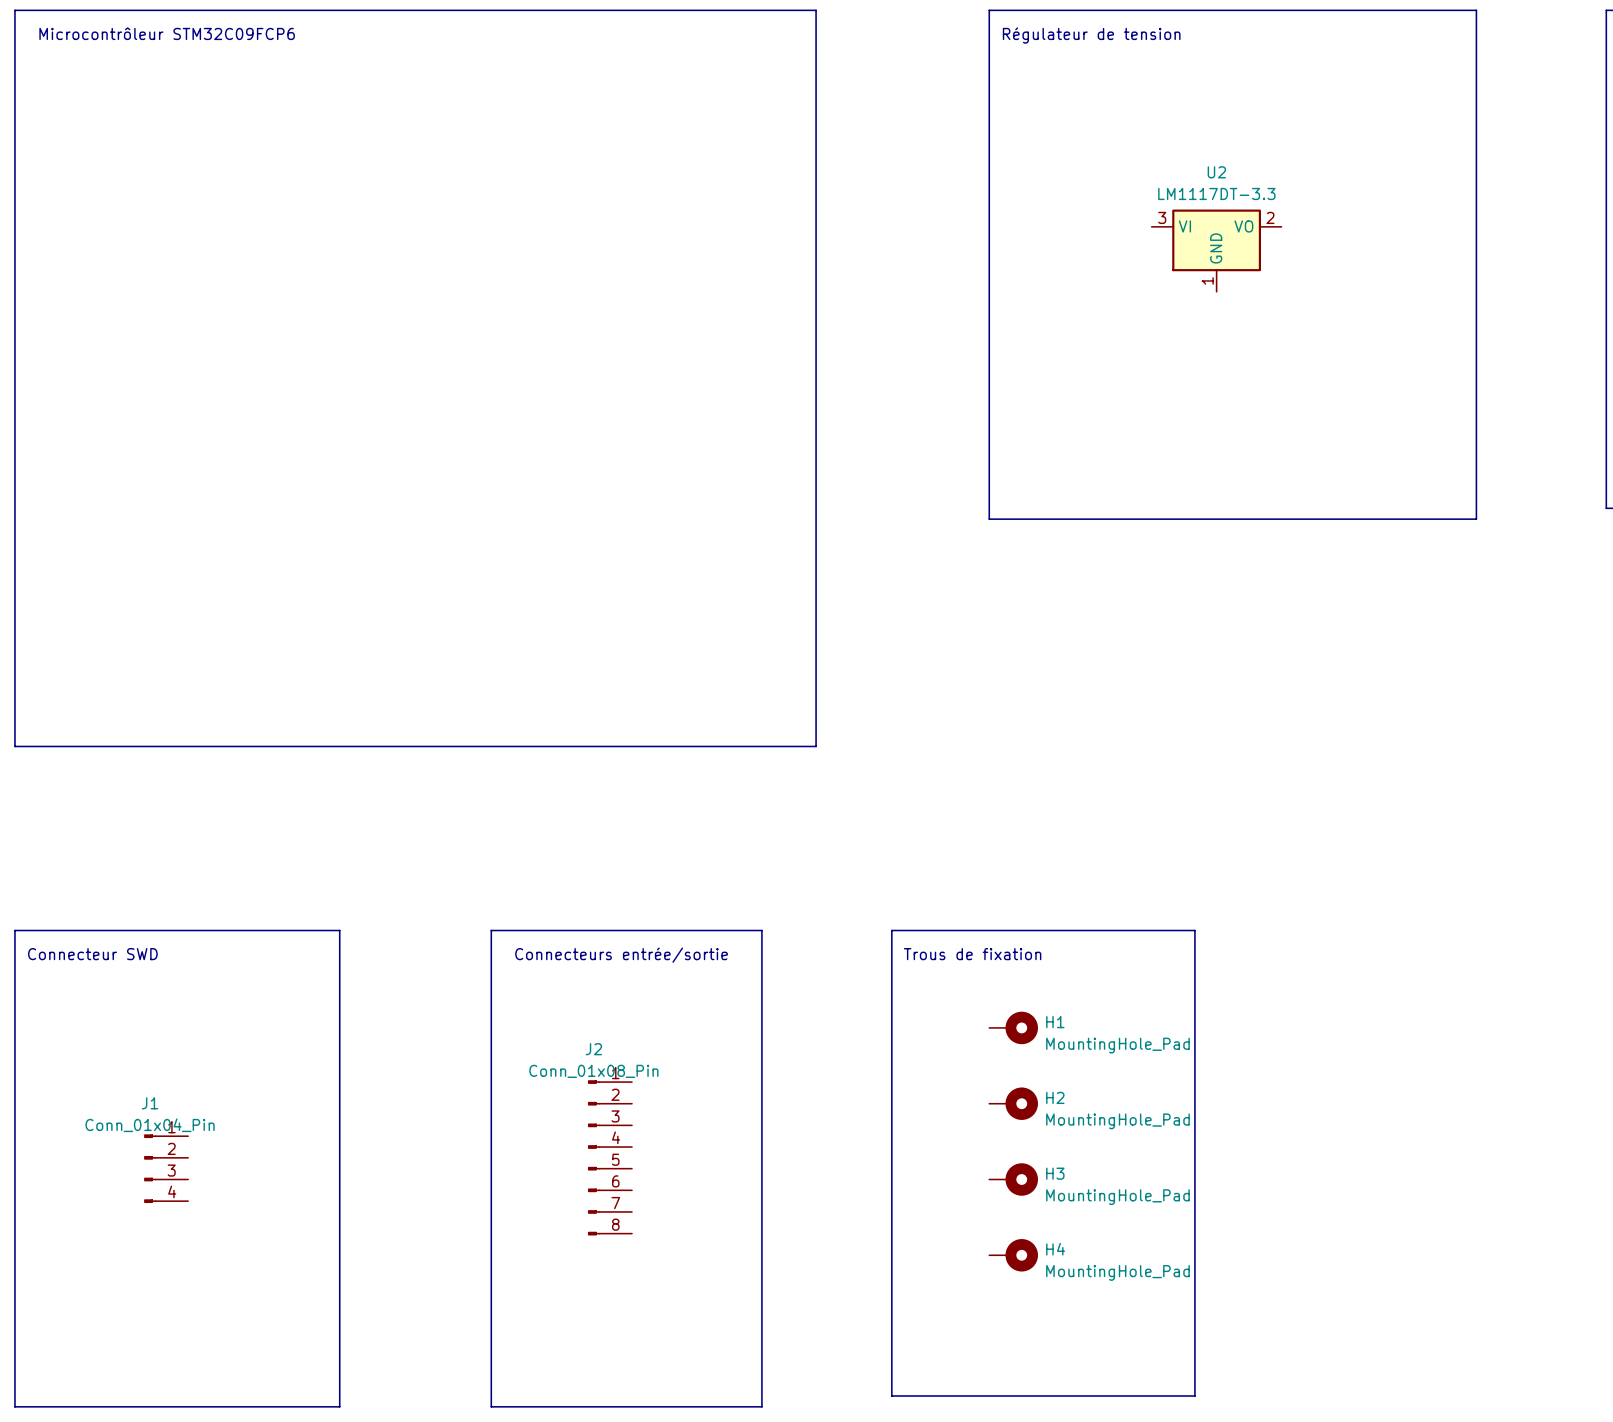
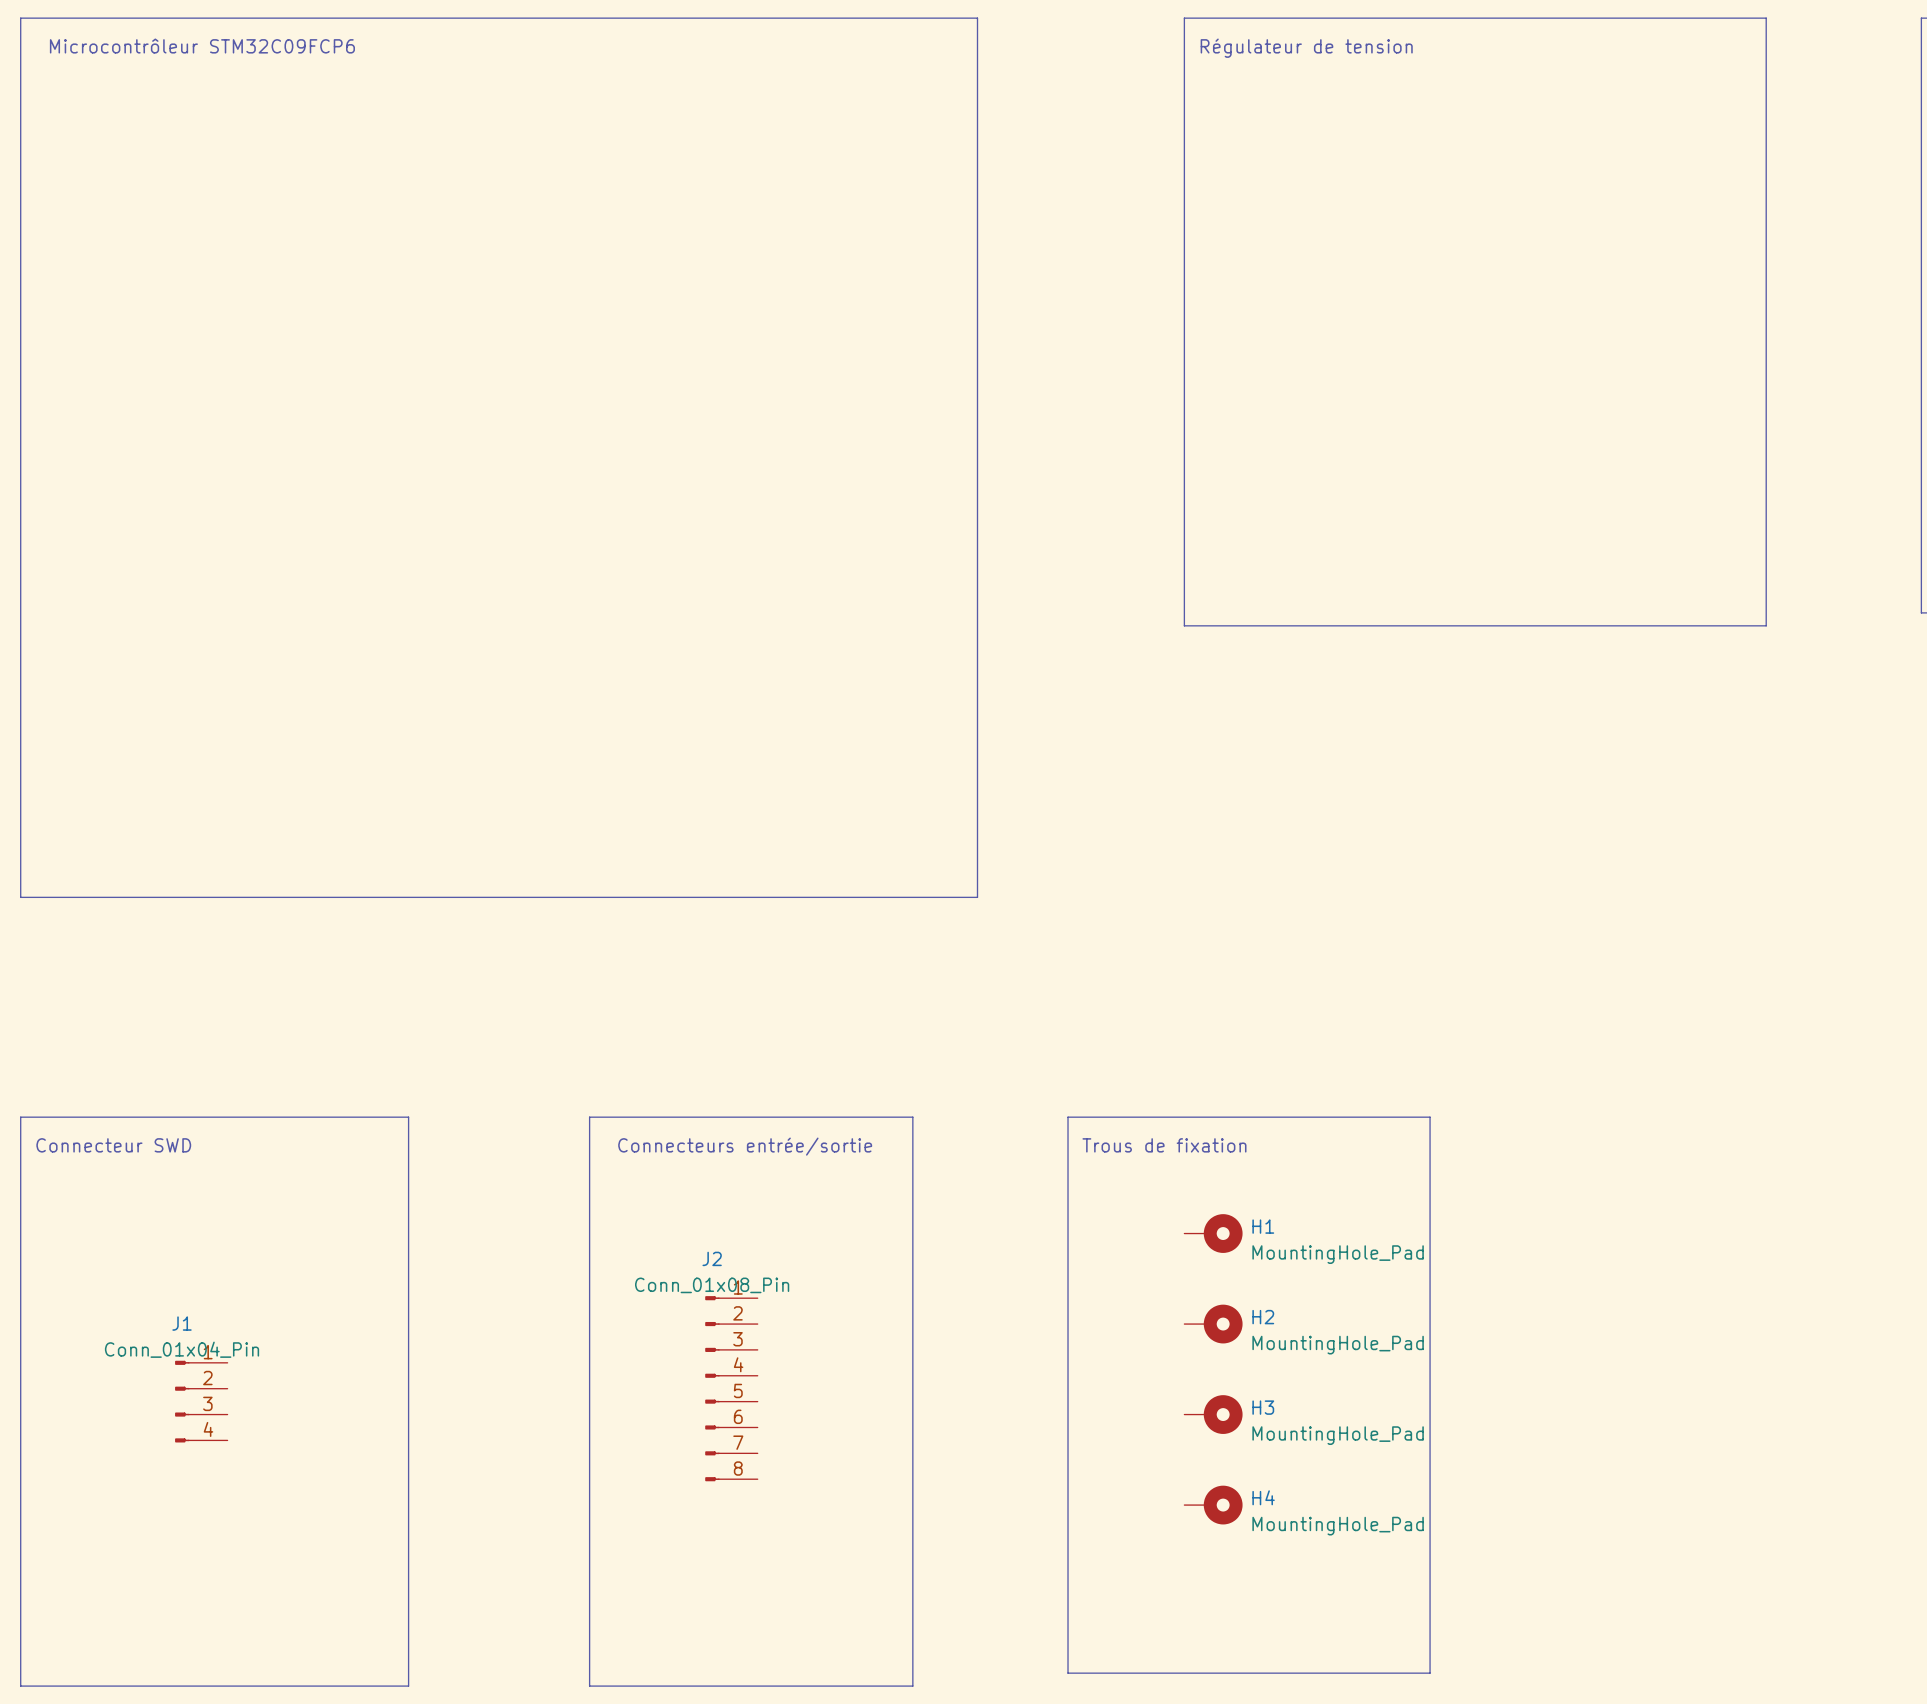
U2: LM1117DT-3.3 (1216, 250) -> none

